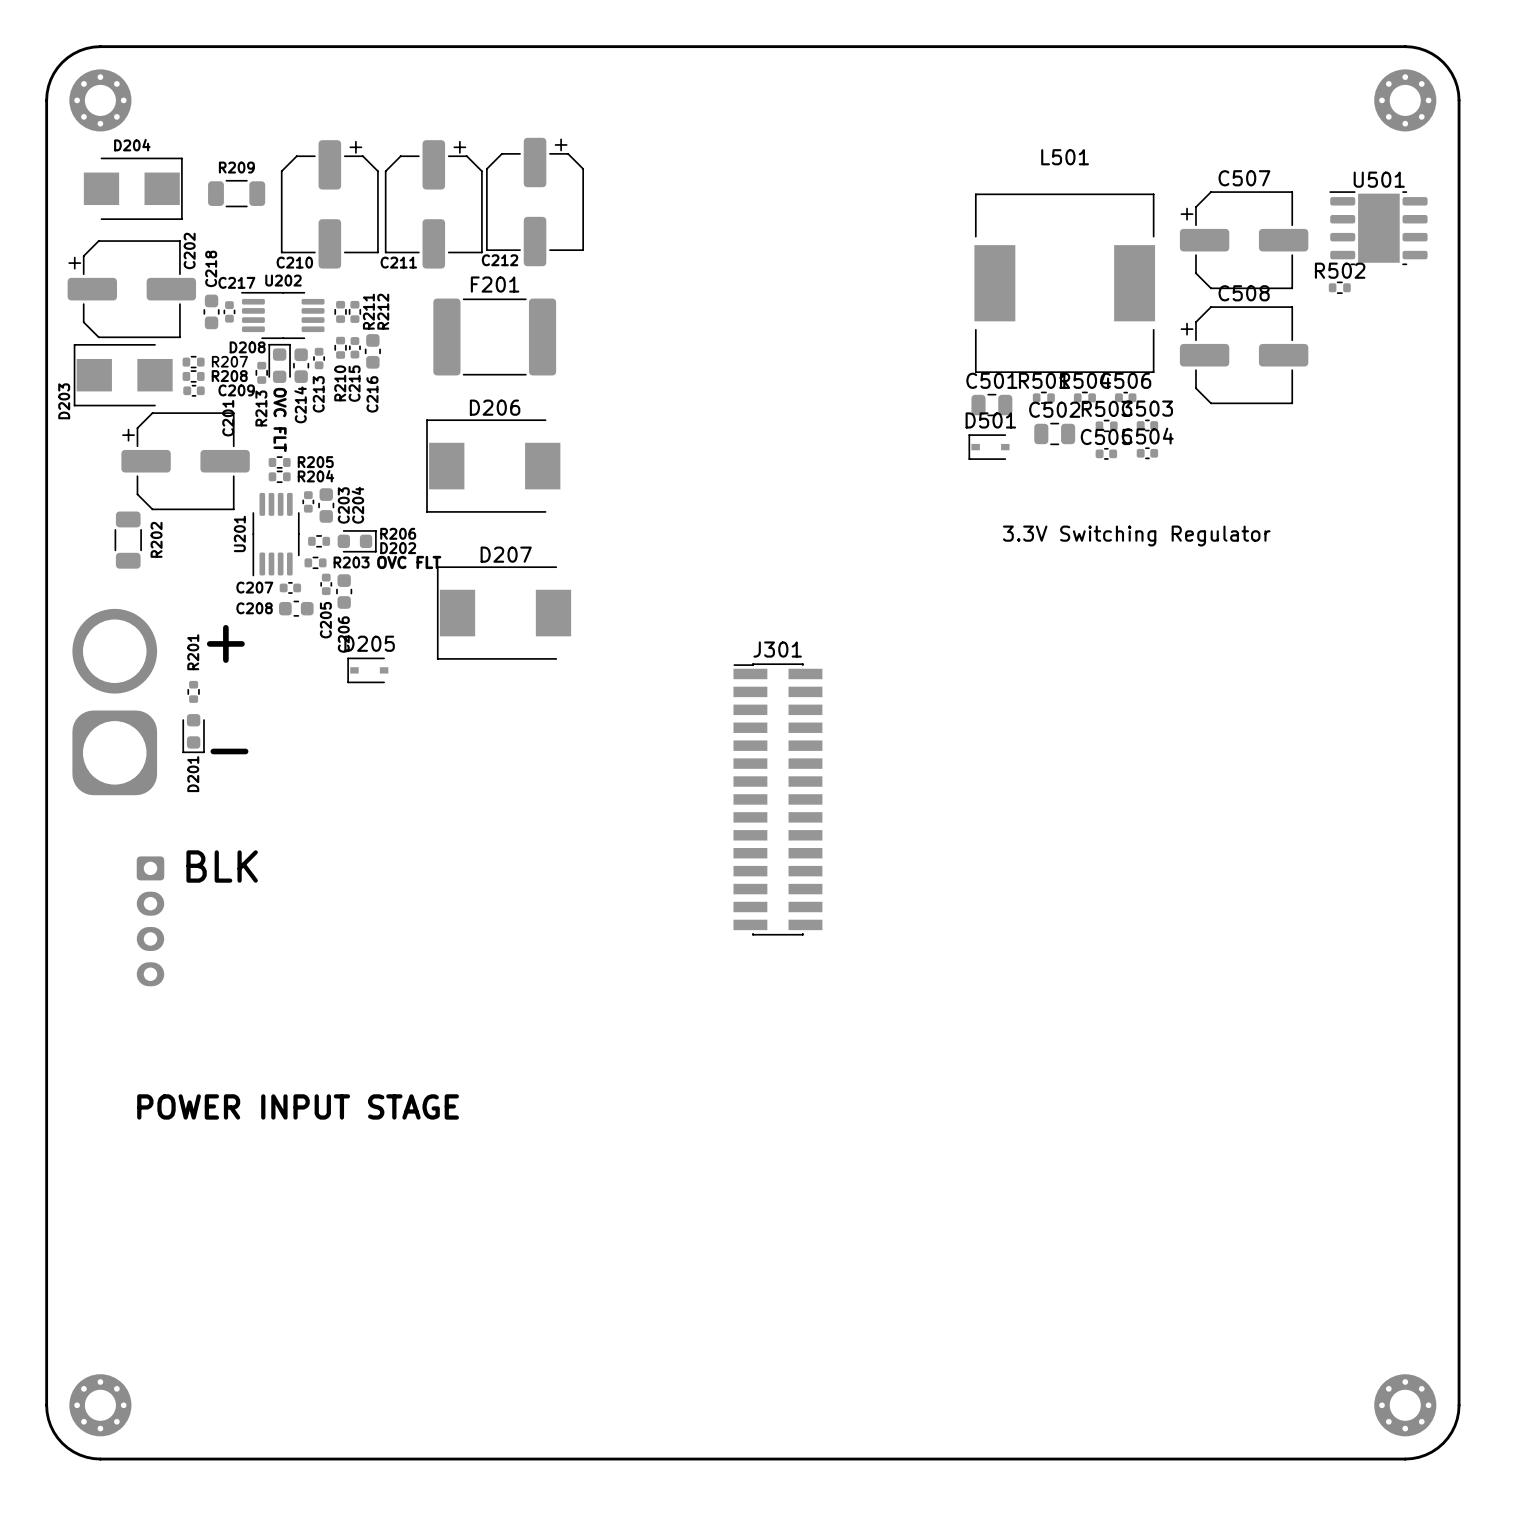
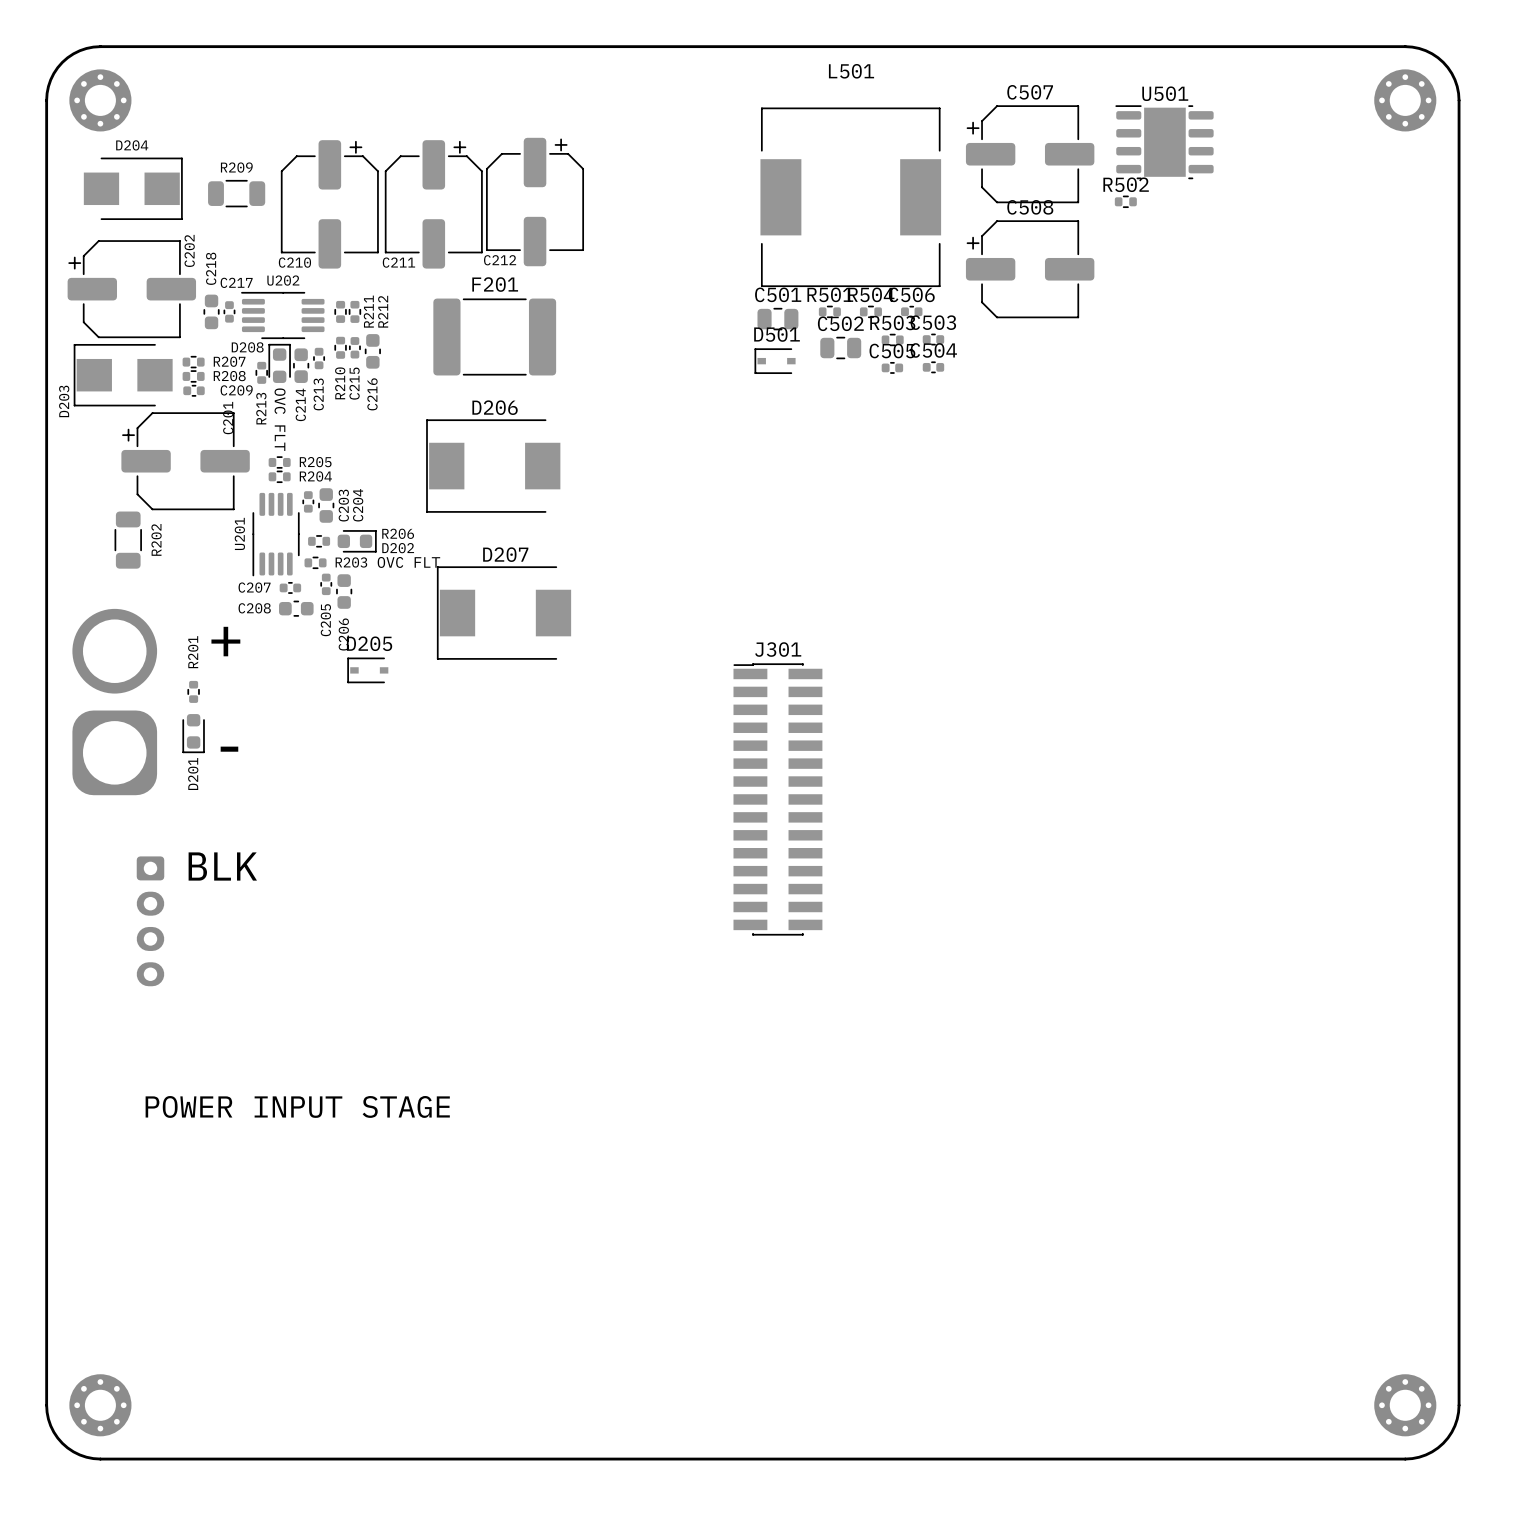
C507 footprint: [1179, 191, 1309, 290] -> [965, 105, 1095, 204]
U501 position: (1378, 228) -> (1164, 142)
L501 position: (1064, 283) -> (850, 197)
R502 position: (1339, 287) -> (1125, 201)
C508 footprint: [1179, 306, 1309, 405] -> [965, 220, 1095, 319]
R501 position: (1043, 397) -> (829, 311)
R504 position: (1084, 397) -> (870, 311)
C506 position: (1125, 397) -> (911, 311)
C501 position: (991, 405) -> (777, 319)
R503 position: (1106, 425) -> (892, 339)
C503 position: (1147, 425) -> (933, 339)
C502 position: (1054, 433) -> (840, 348)
D501 position: (989, 447) -> (775, 361)
C505 position: (1106, 453) -> (892, 367)
C504 position: (1147, 453) -> (933, 367)
text: 3.3V Switching Regulator (1136, 536) -> none

